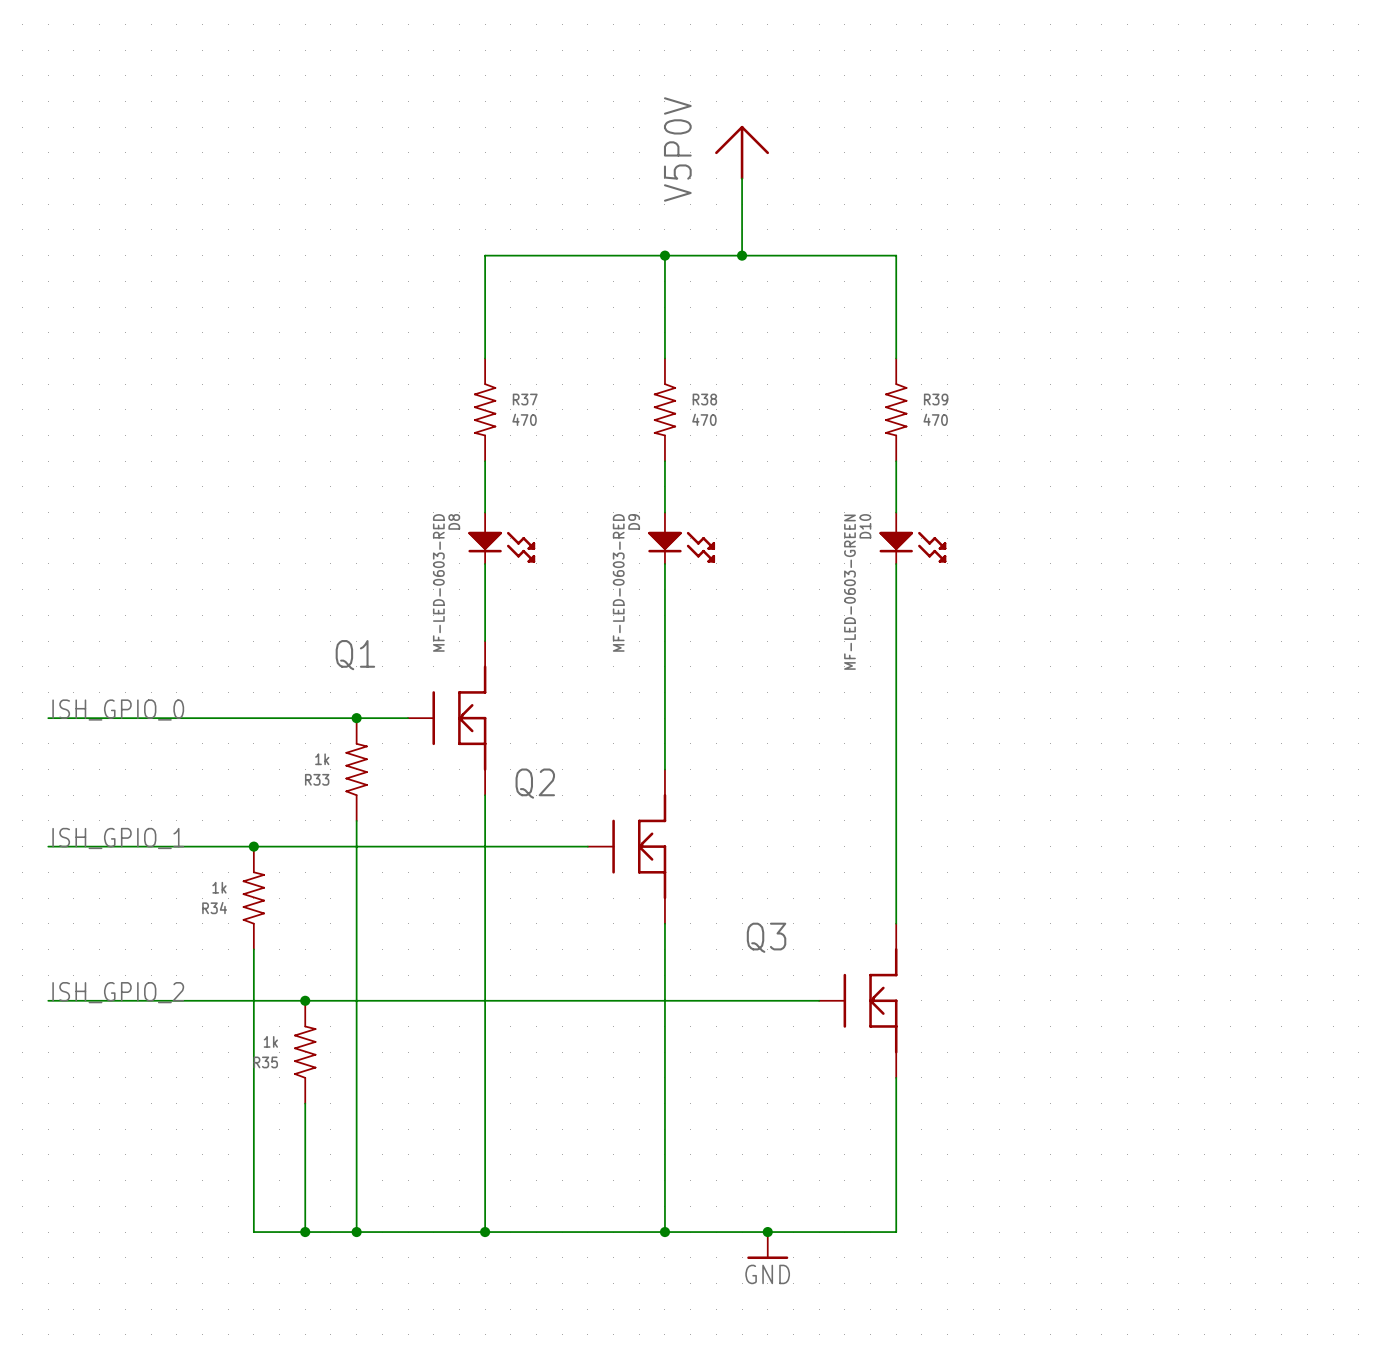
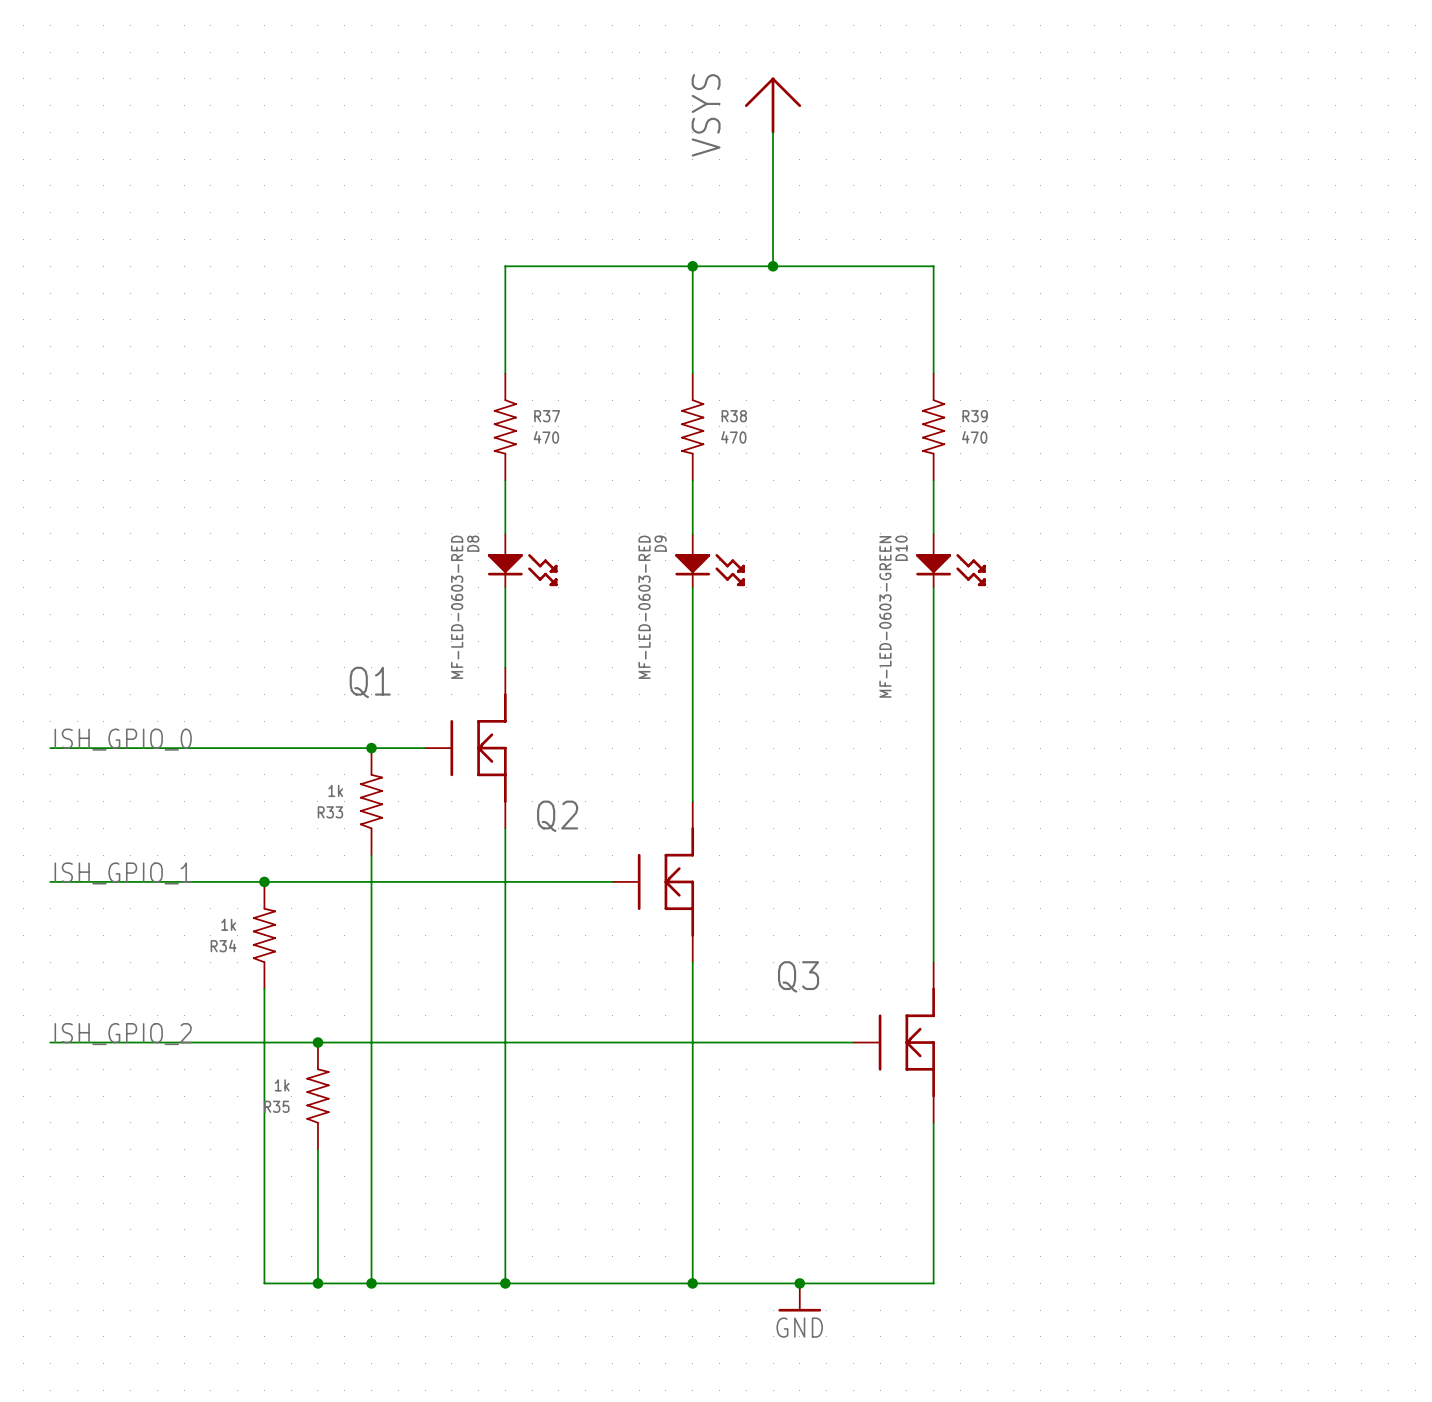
power symbol: none -> VSYS (773, 105)
power symbol: V5P0V (742, 152) -> none

